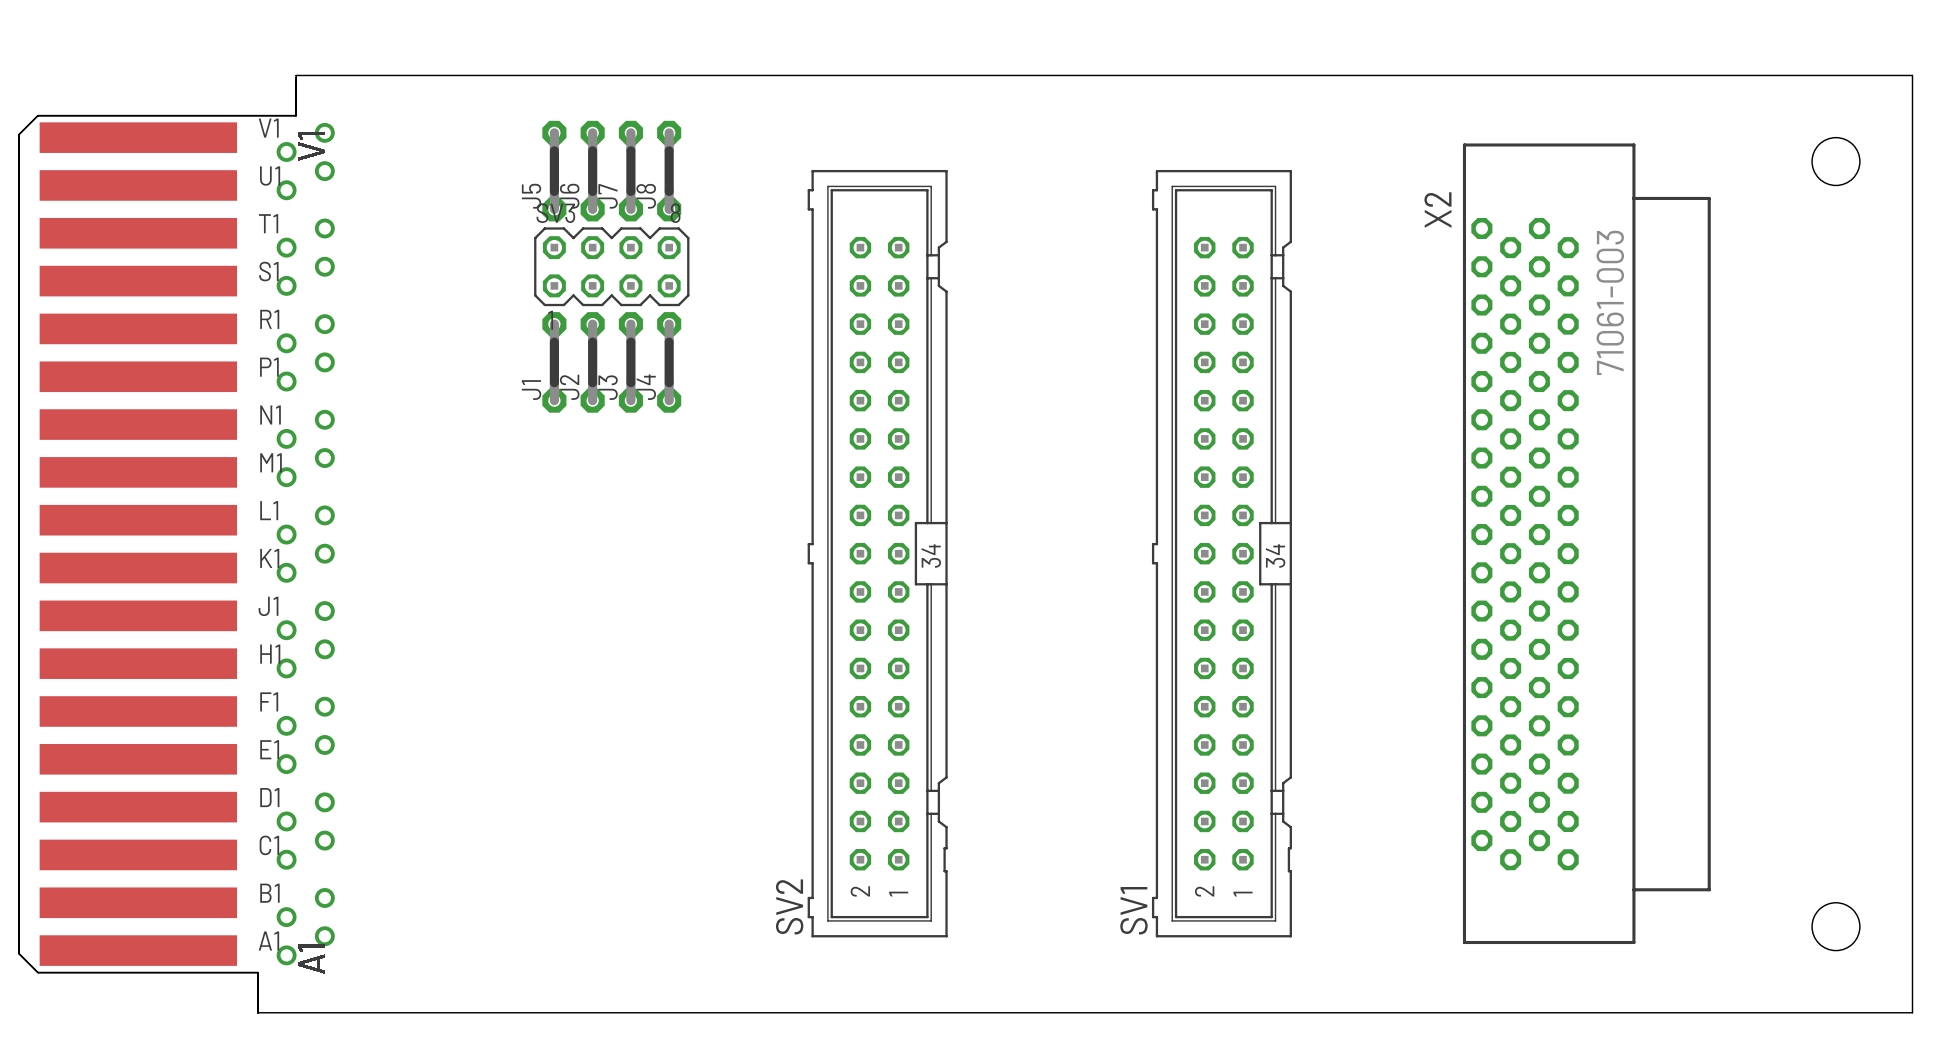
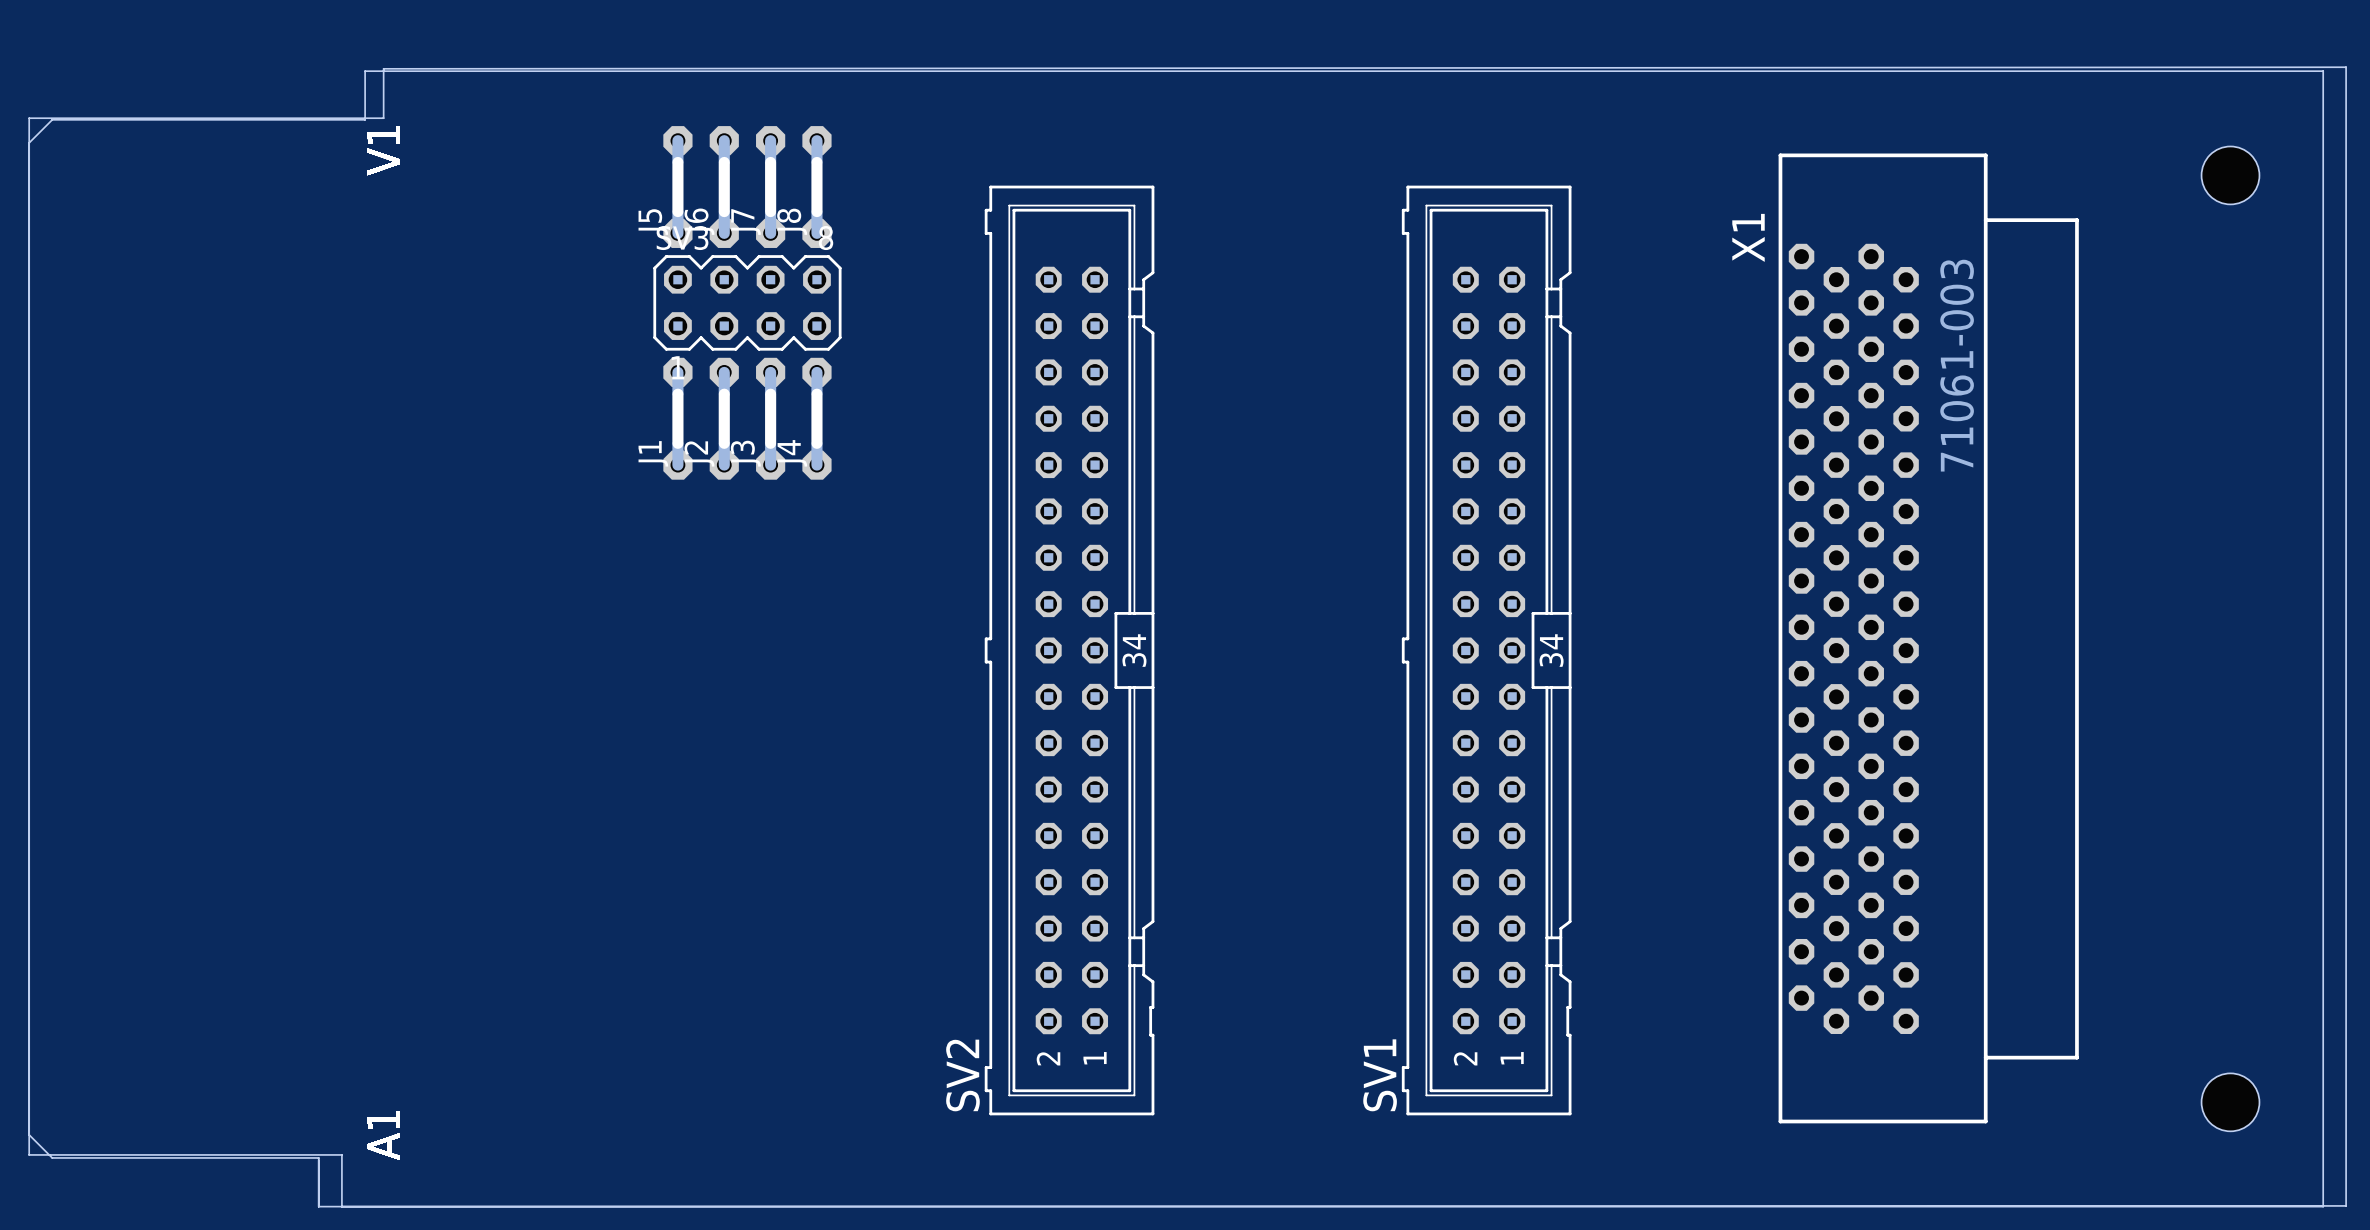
board edge: none -> (2346, 67) (2346, 1205) (341, 1206) (341, 1154) (29, 1154) (29, 118) (383, 118) (383, 68) (2346, 67)
X2 name: X2 (1437, 209) -> X1 (1748, 237)
part: (305, 544) -> none
part: (157, 545) -> none

